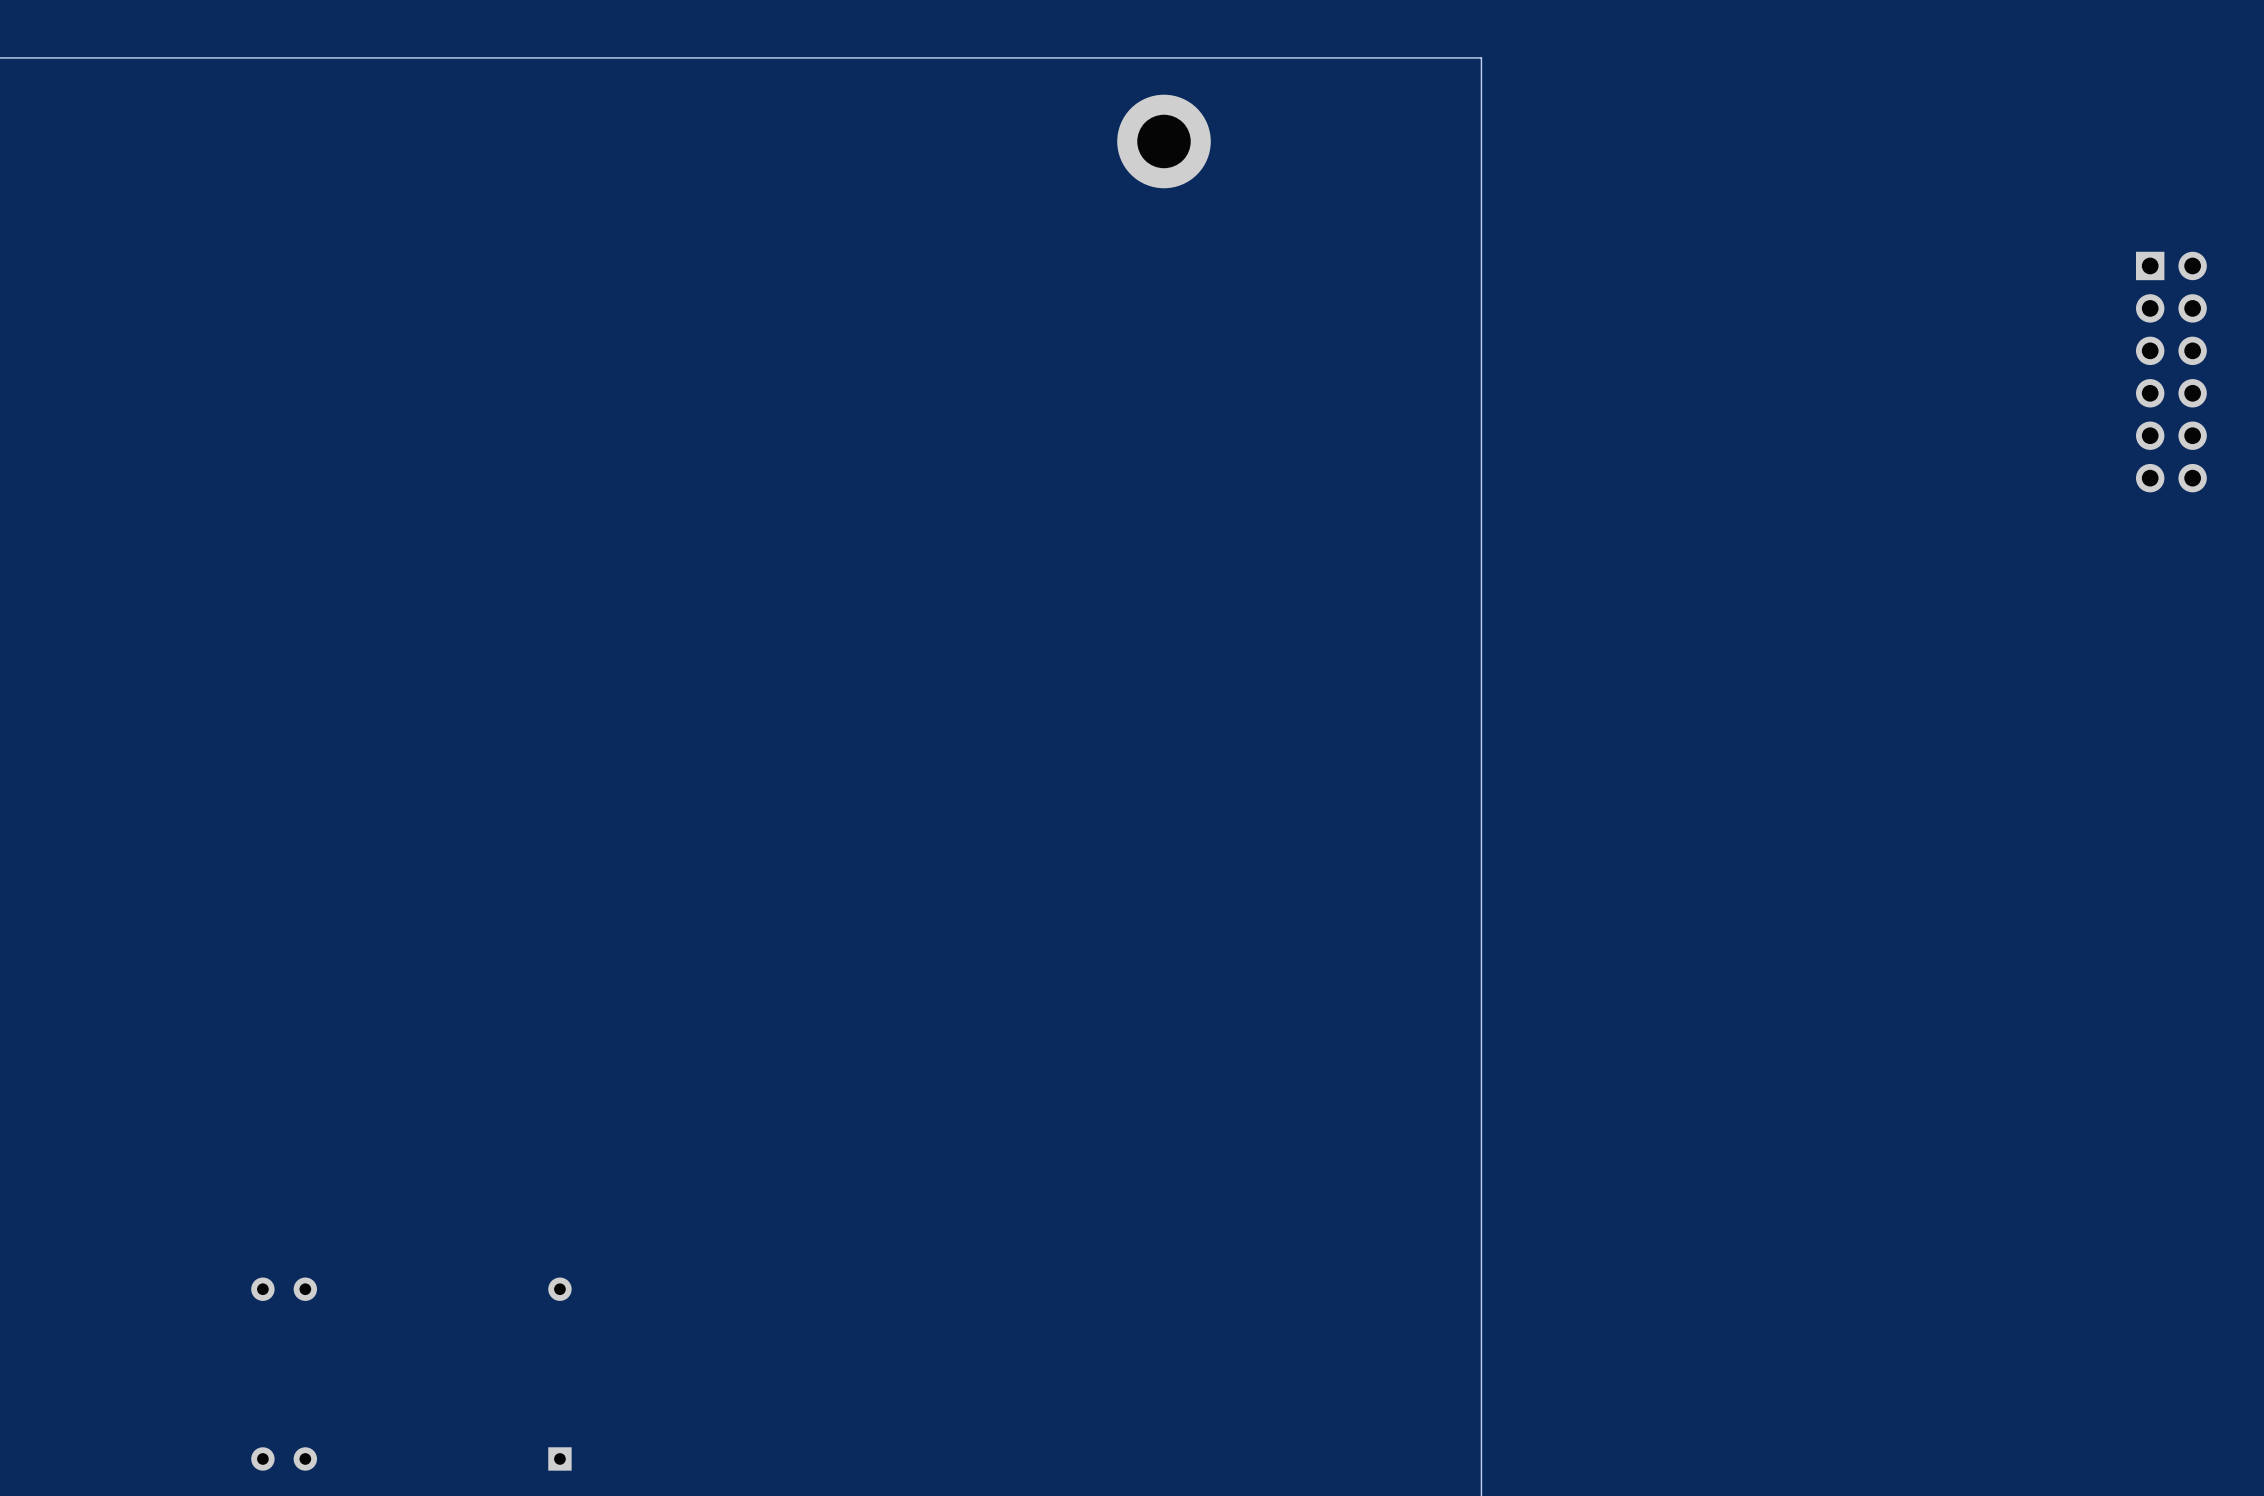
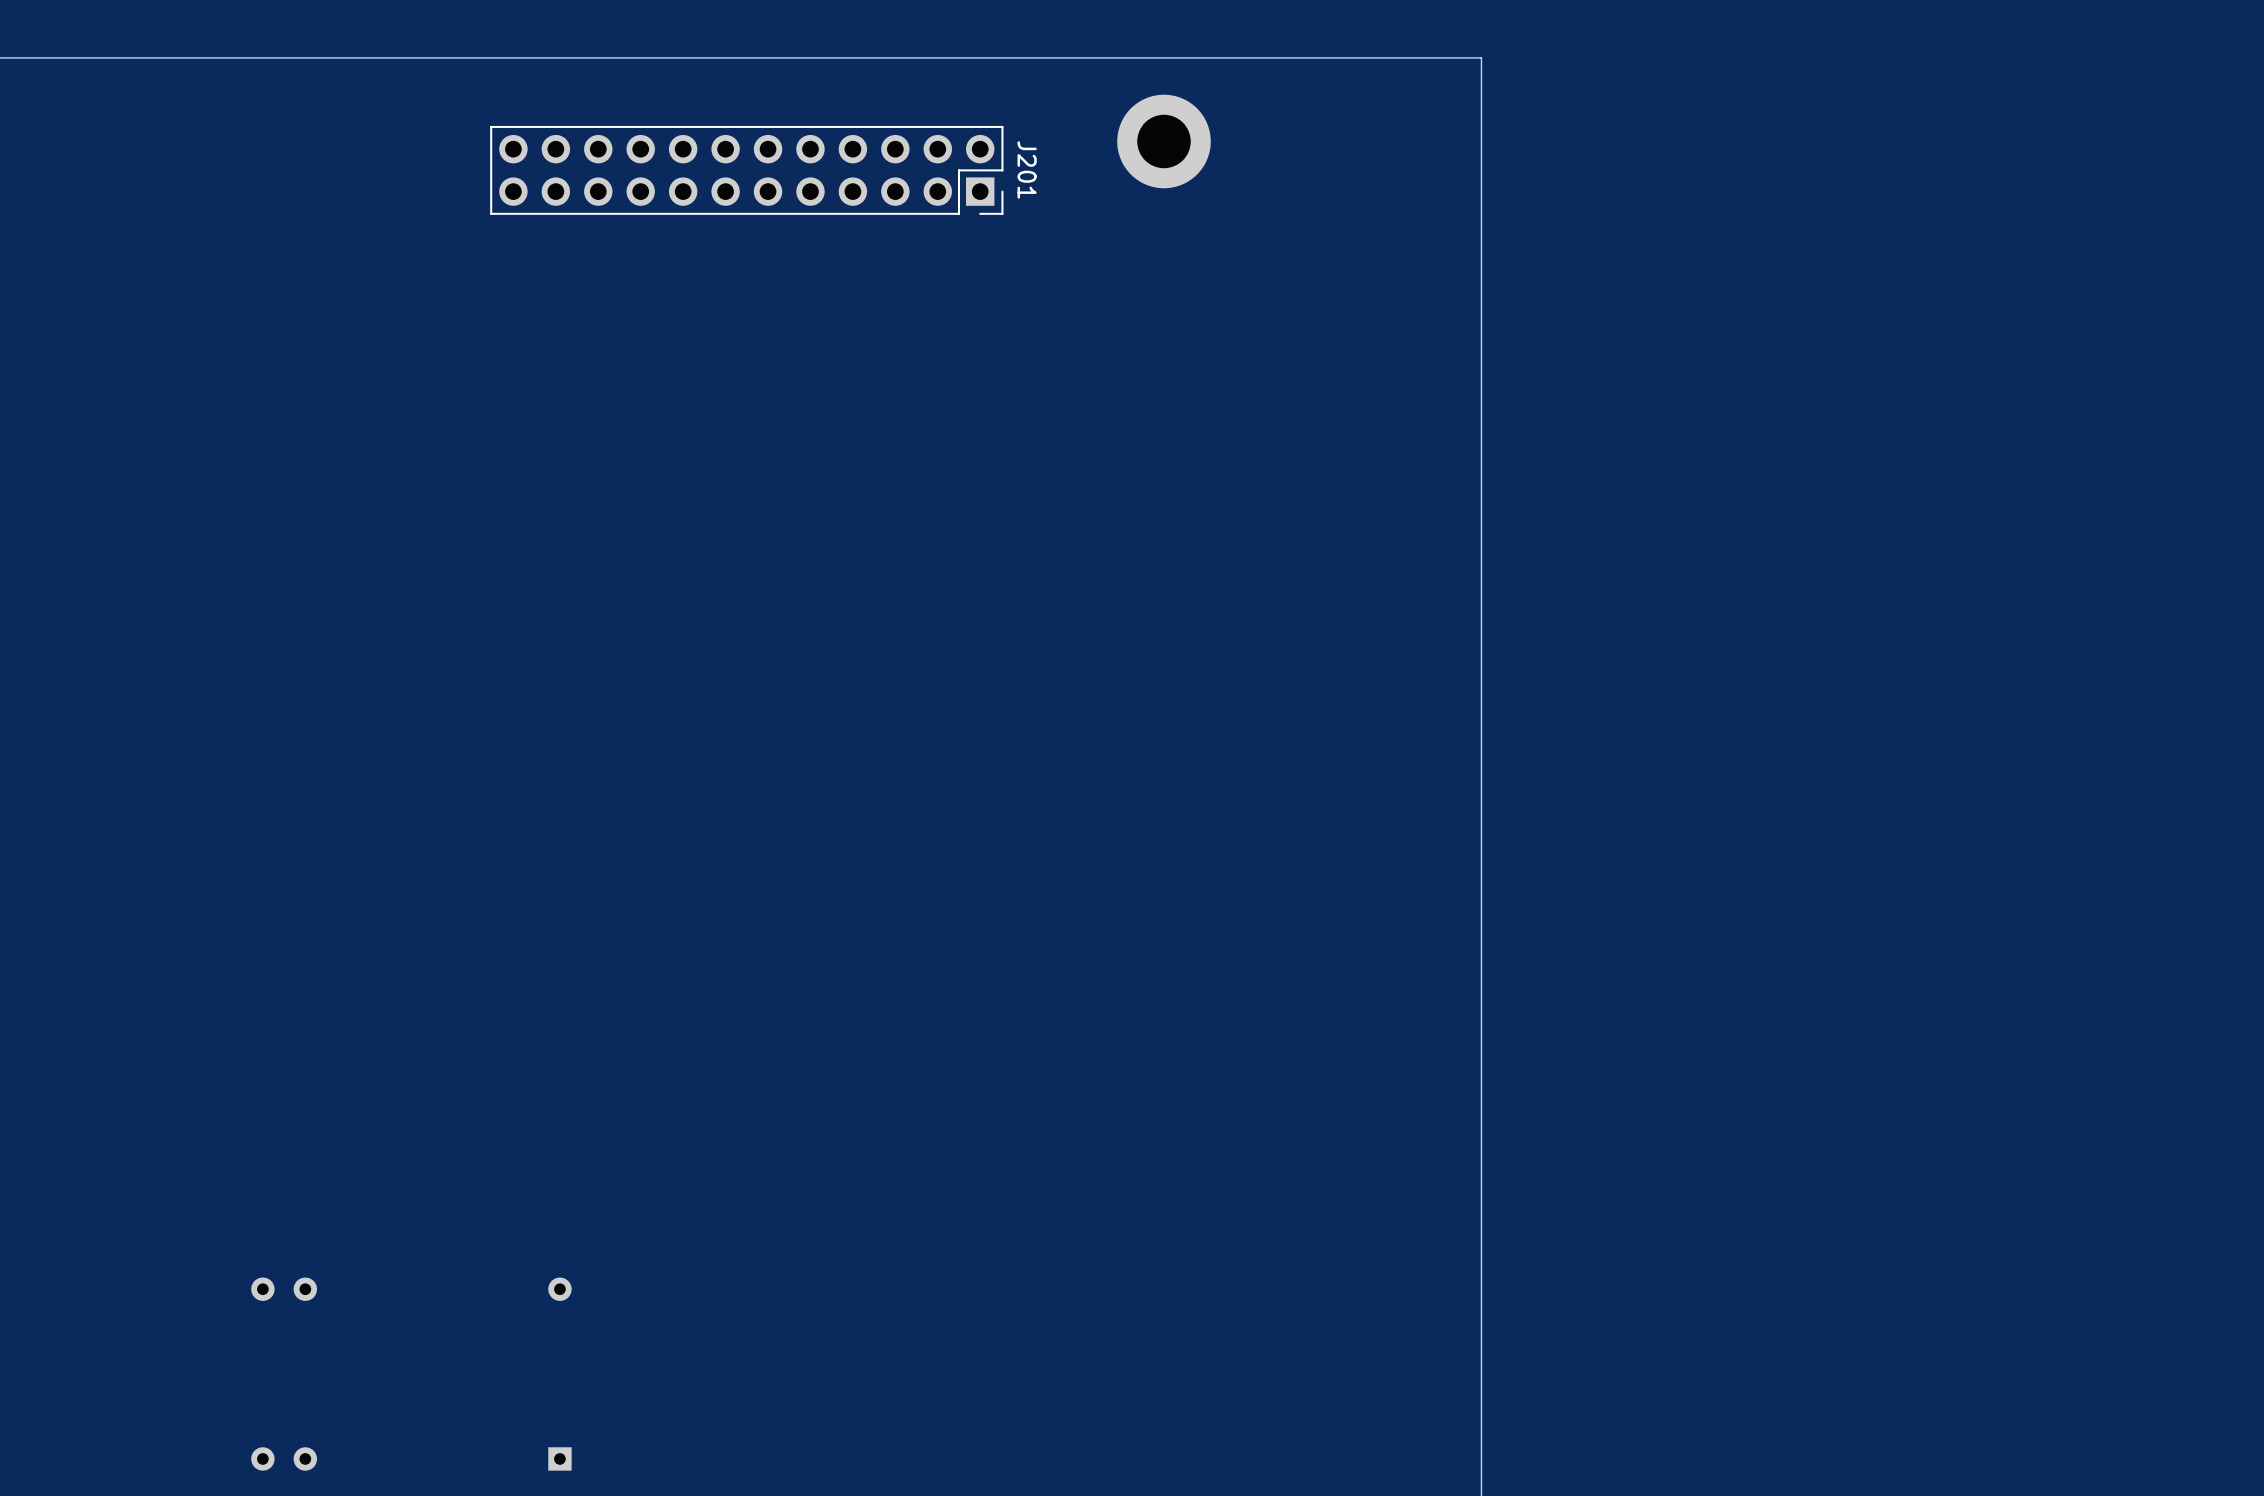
J201: none -> (746, 170)
part: (2171, 372) -> none

